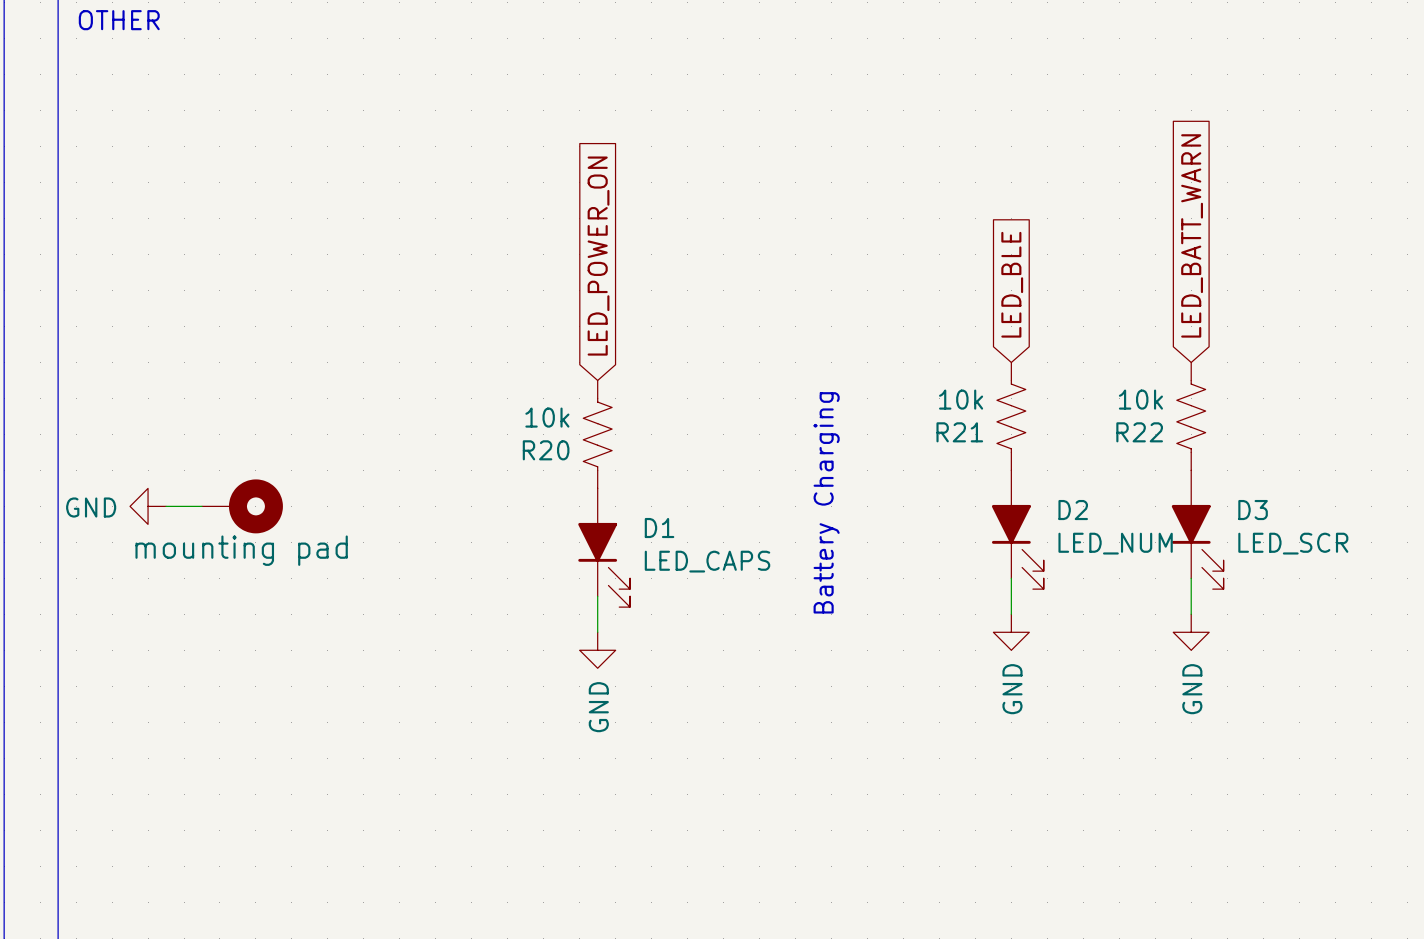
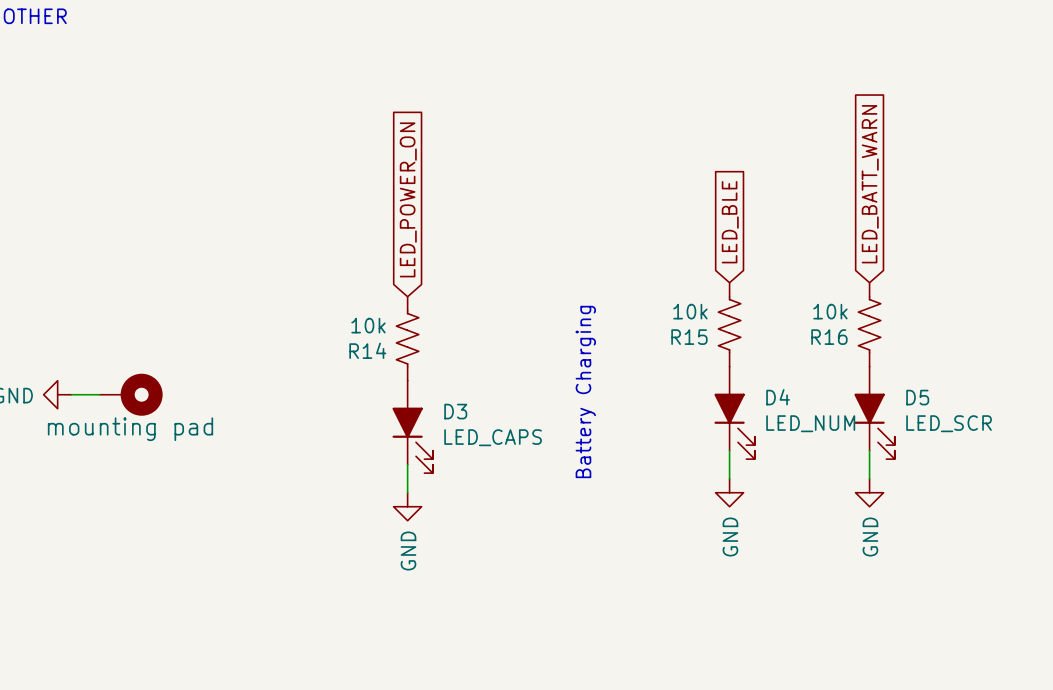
R21 name: R21 (959, 432) -> R15 (689, 337)
R22 name: R22 (1139, 432) -> R16 (829, 337)
R20 name: R20 (546, 450) -> R14 (367, 350)
D2 name: D2 (1073, 510) -> D4 (778, 397)
D3 name: D3 (1253, 510) -> D5 (917, 397)
D1 name: D1 (659, 528) -> D3 (455, 411)

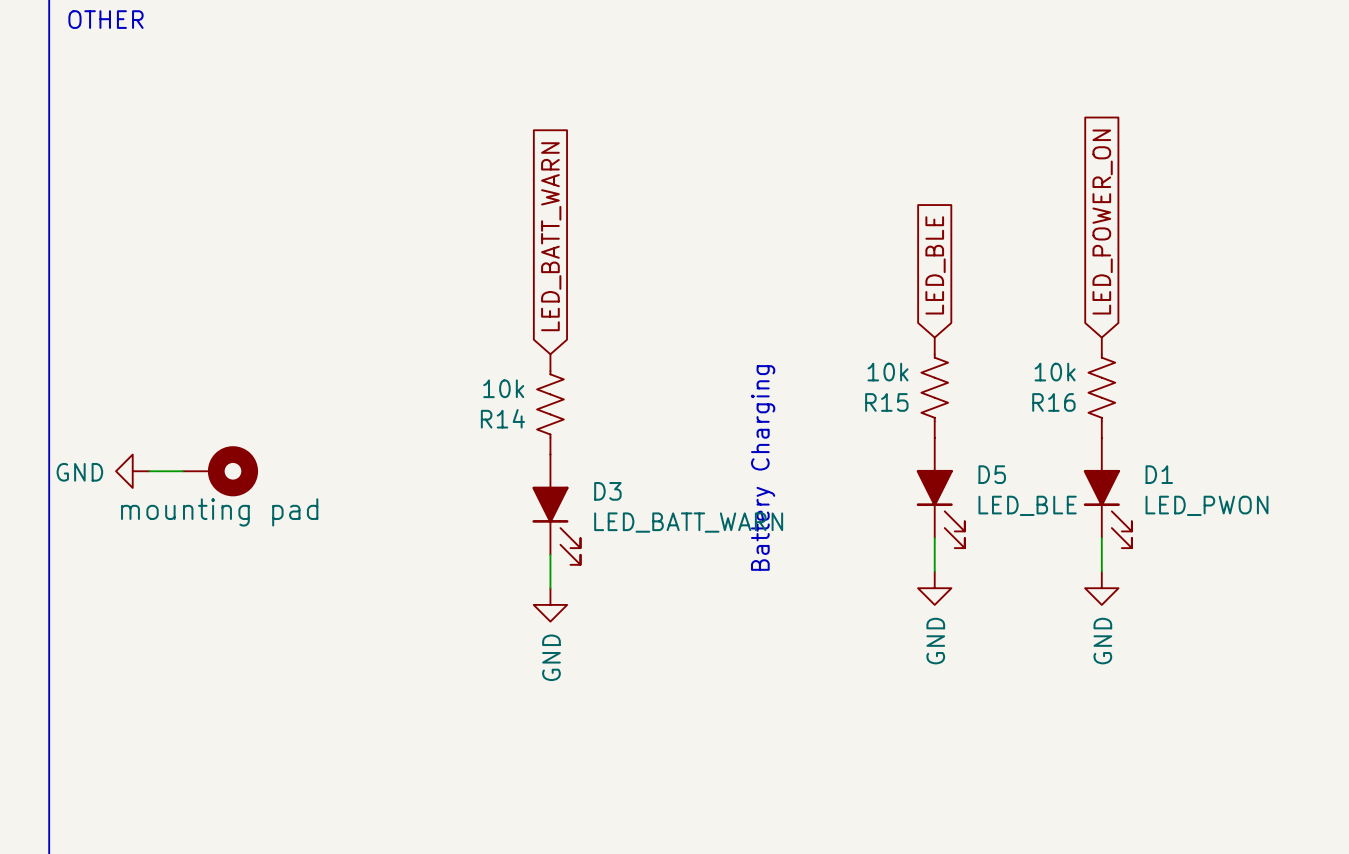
global label: LED_BATT_WARN (870, 184) -> LED_POWER_ON (1102, 222)
global label: LED_POWER_ON (408, 199) -> LED_BATT_WARN (551, 236)
D4 name: D4 (778, 397) -> D5 (992, 474)
D5 name: D5 (917, 397) -> D1 (1159, 474)
D4 value: LED_NUM (810, 423) -> LED_BLE (1027, 505)
D5 value: LED_SCR (949, 423) -> LED_PWON (1207, 505)
D3 value: LED_CAPS (493, 437) -> LED_BATT_WARN (688, 522)

